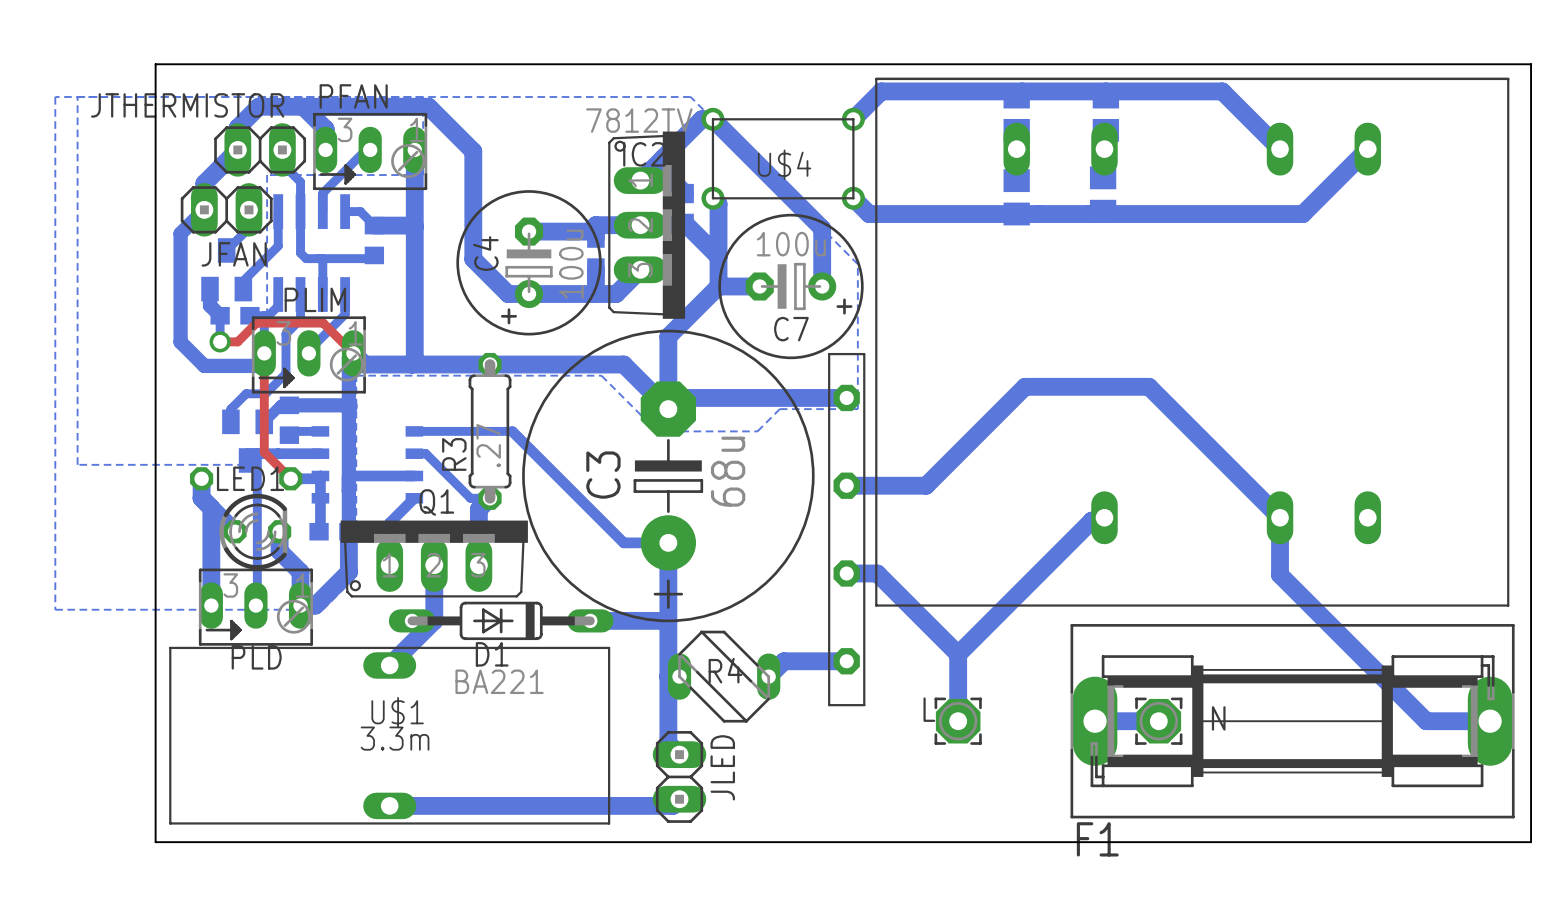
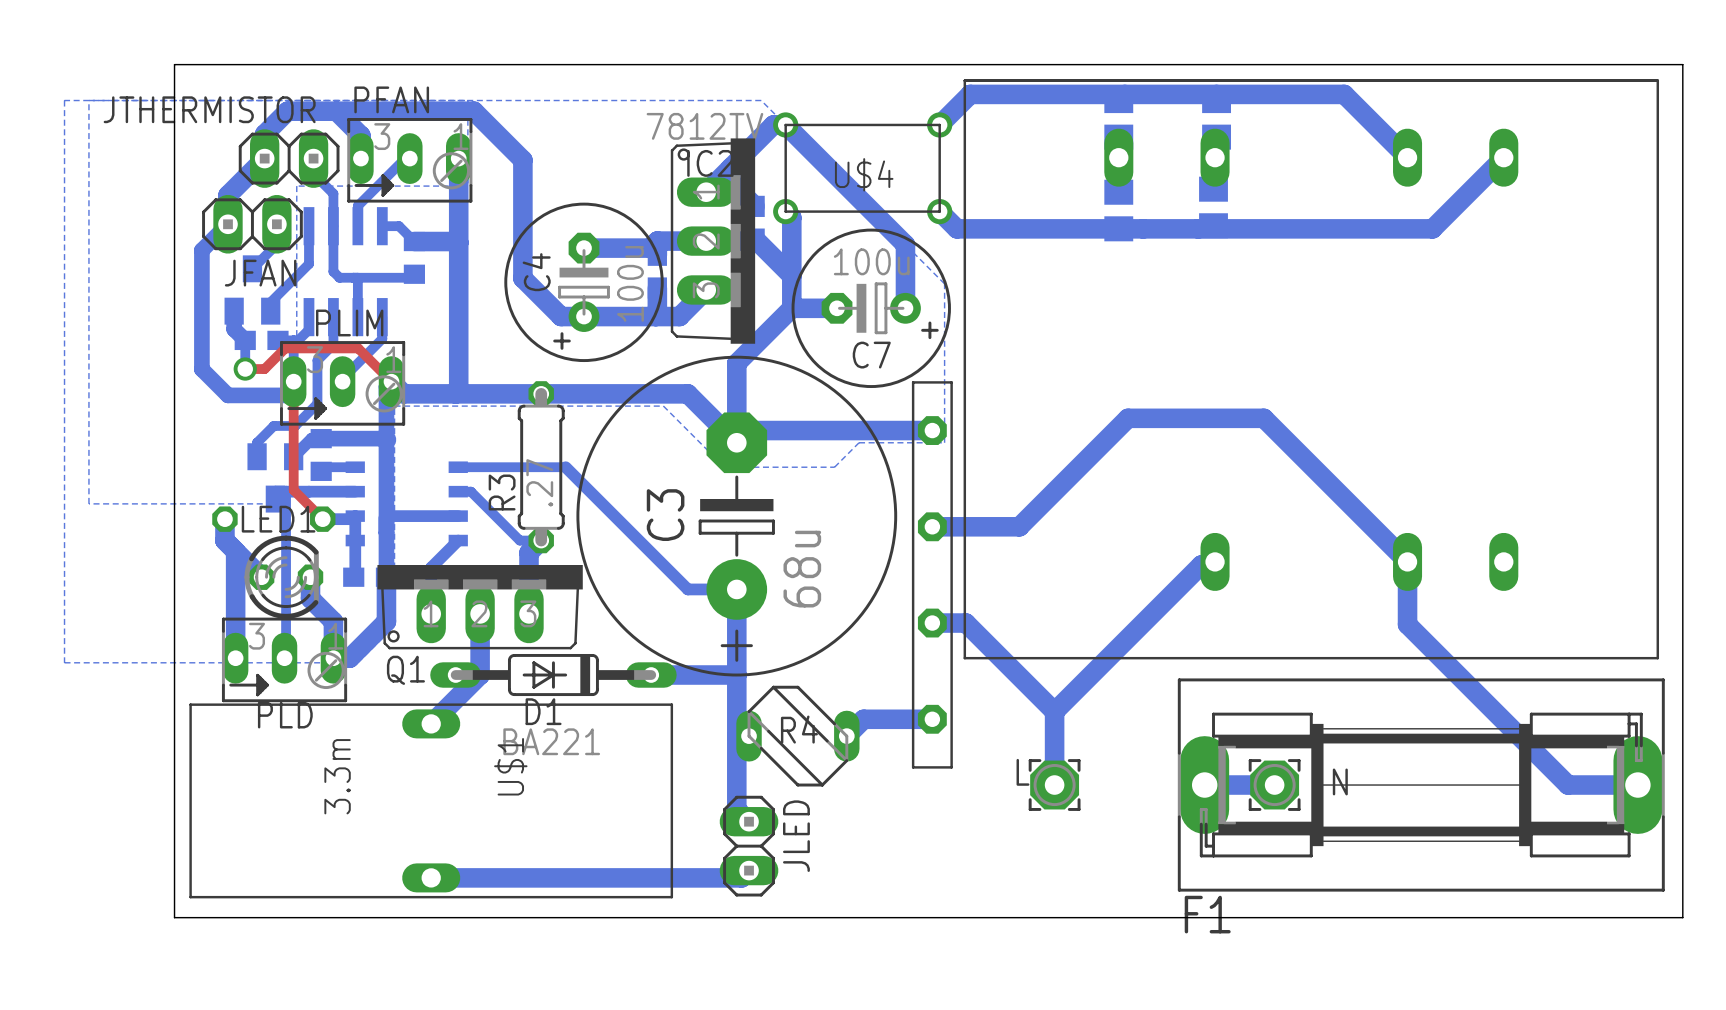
C3 value position: 68u (728, 471) -> 68u (802, 569)
Q1 name position: Q1 (436, 502) -> Q1 (405, 670)
U$1 name rotation: 0° (397, 712) -> 90° counterclockwise (510, 766)
U$1 value rotation: 0° (395, 738) -> 90° counterclockwise (337, 776)
U$1 value position: 3.3m (395, 738) -> 3.3m (337, 776)

